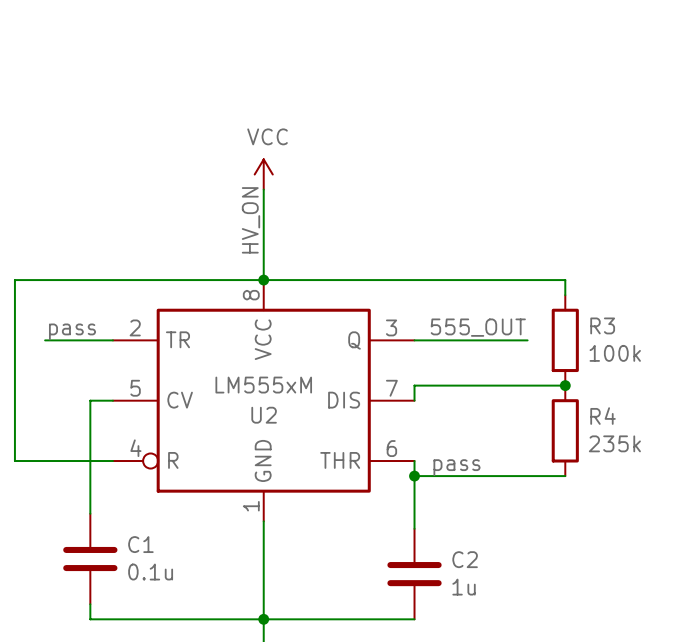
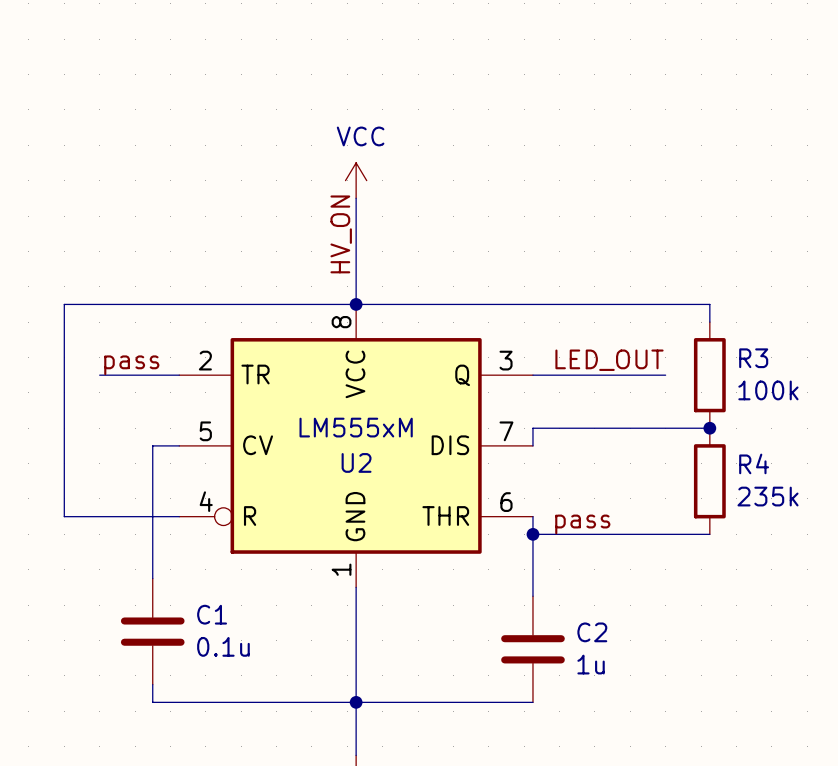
label: 555_OUT (478, 327) -> LED_OUT (609, 360)

